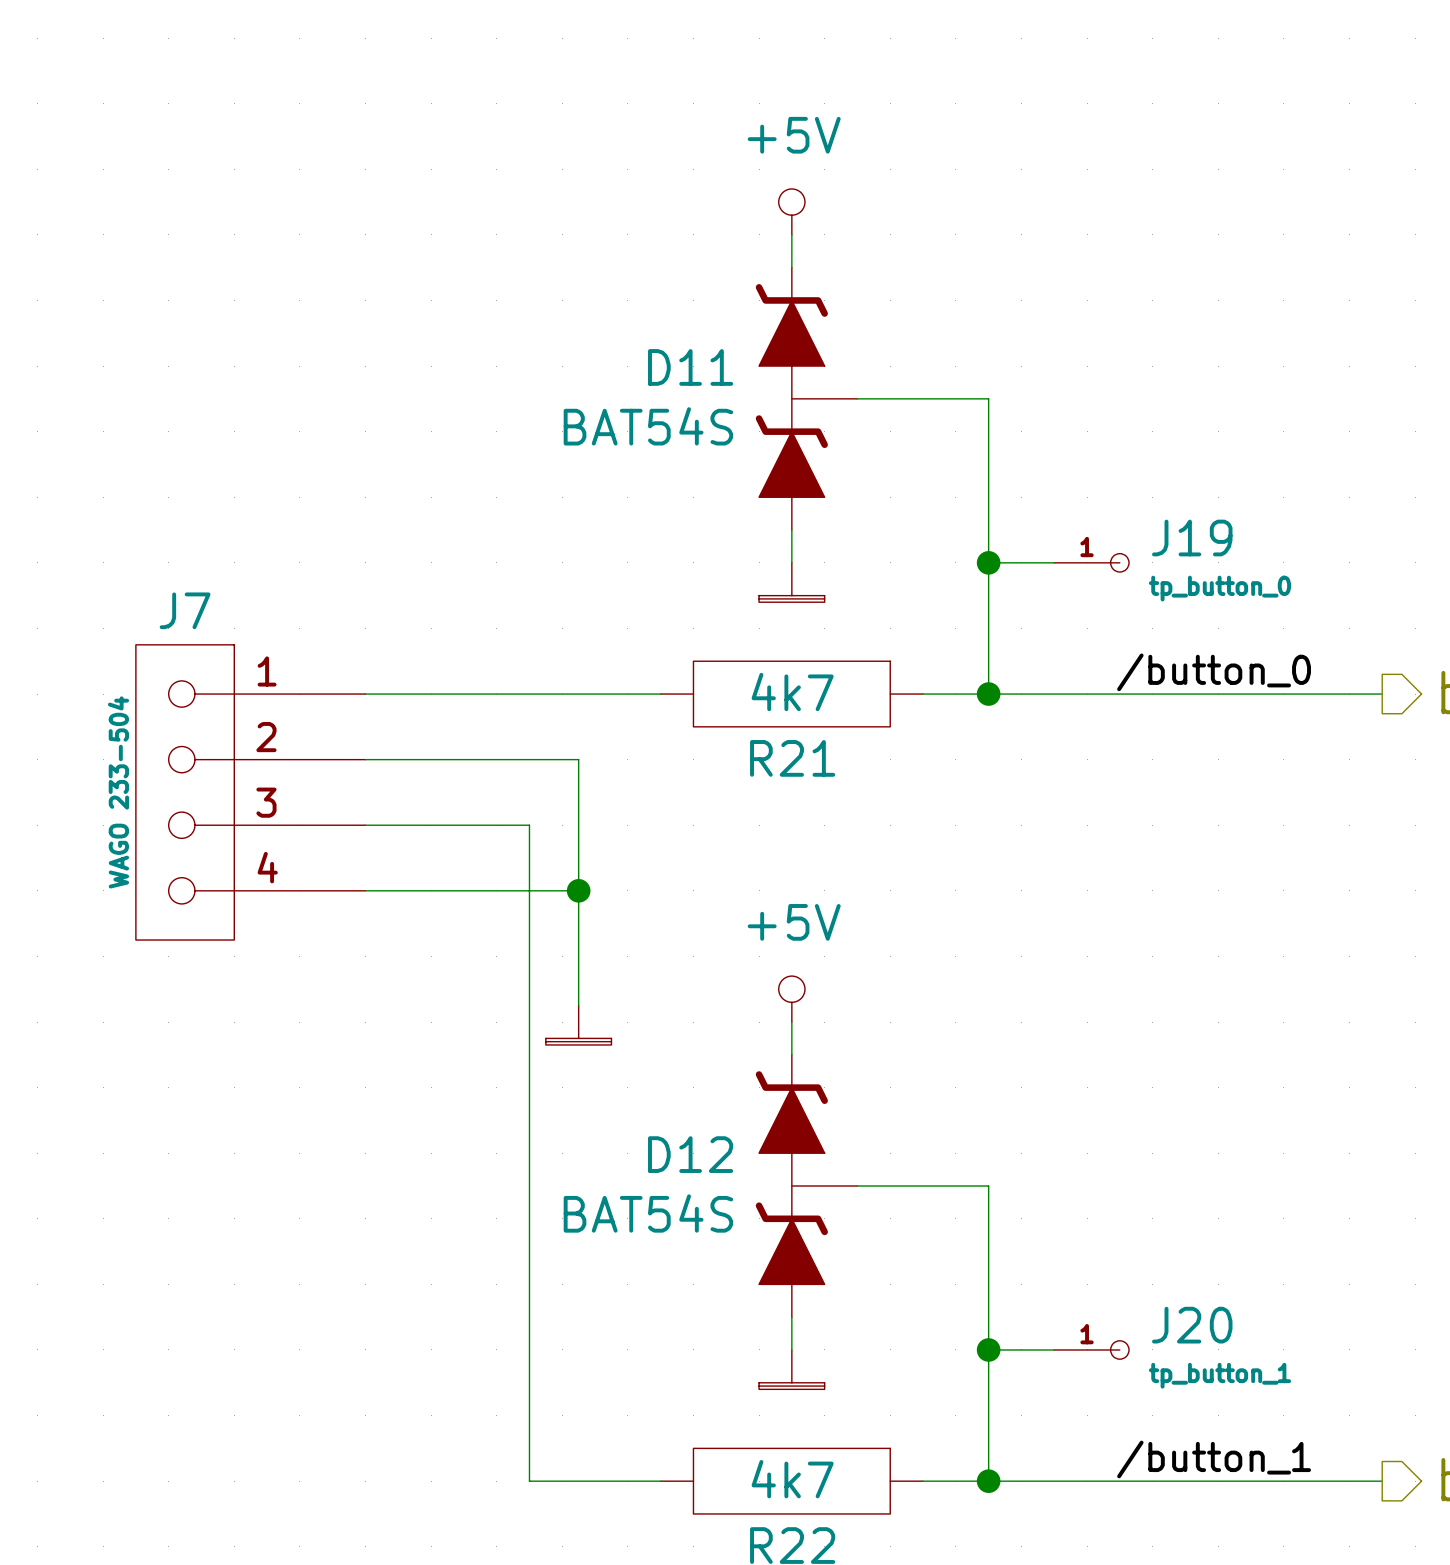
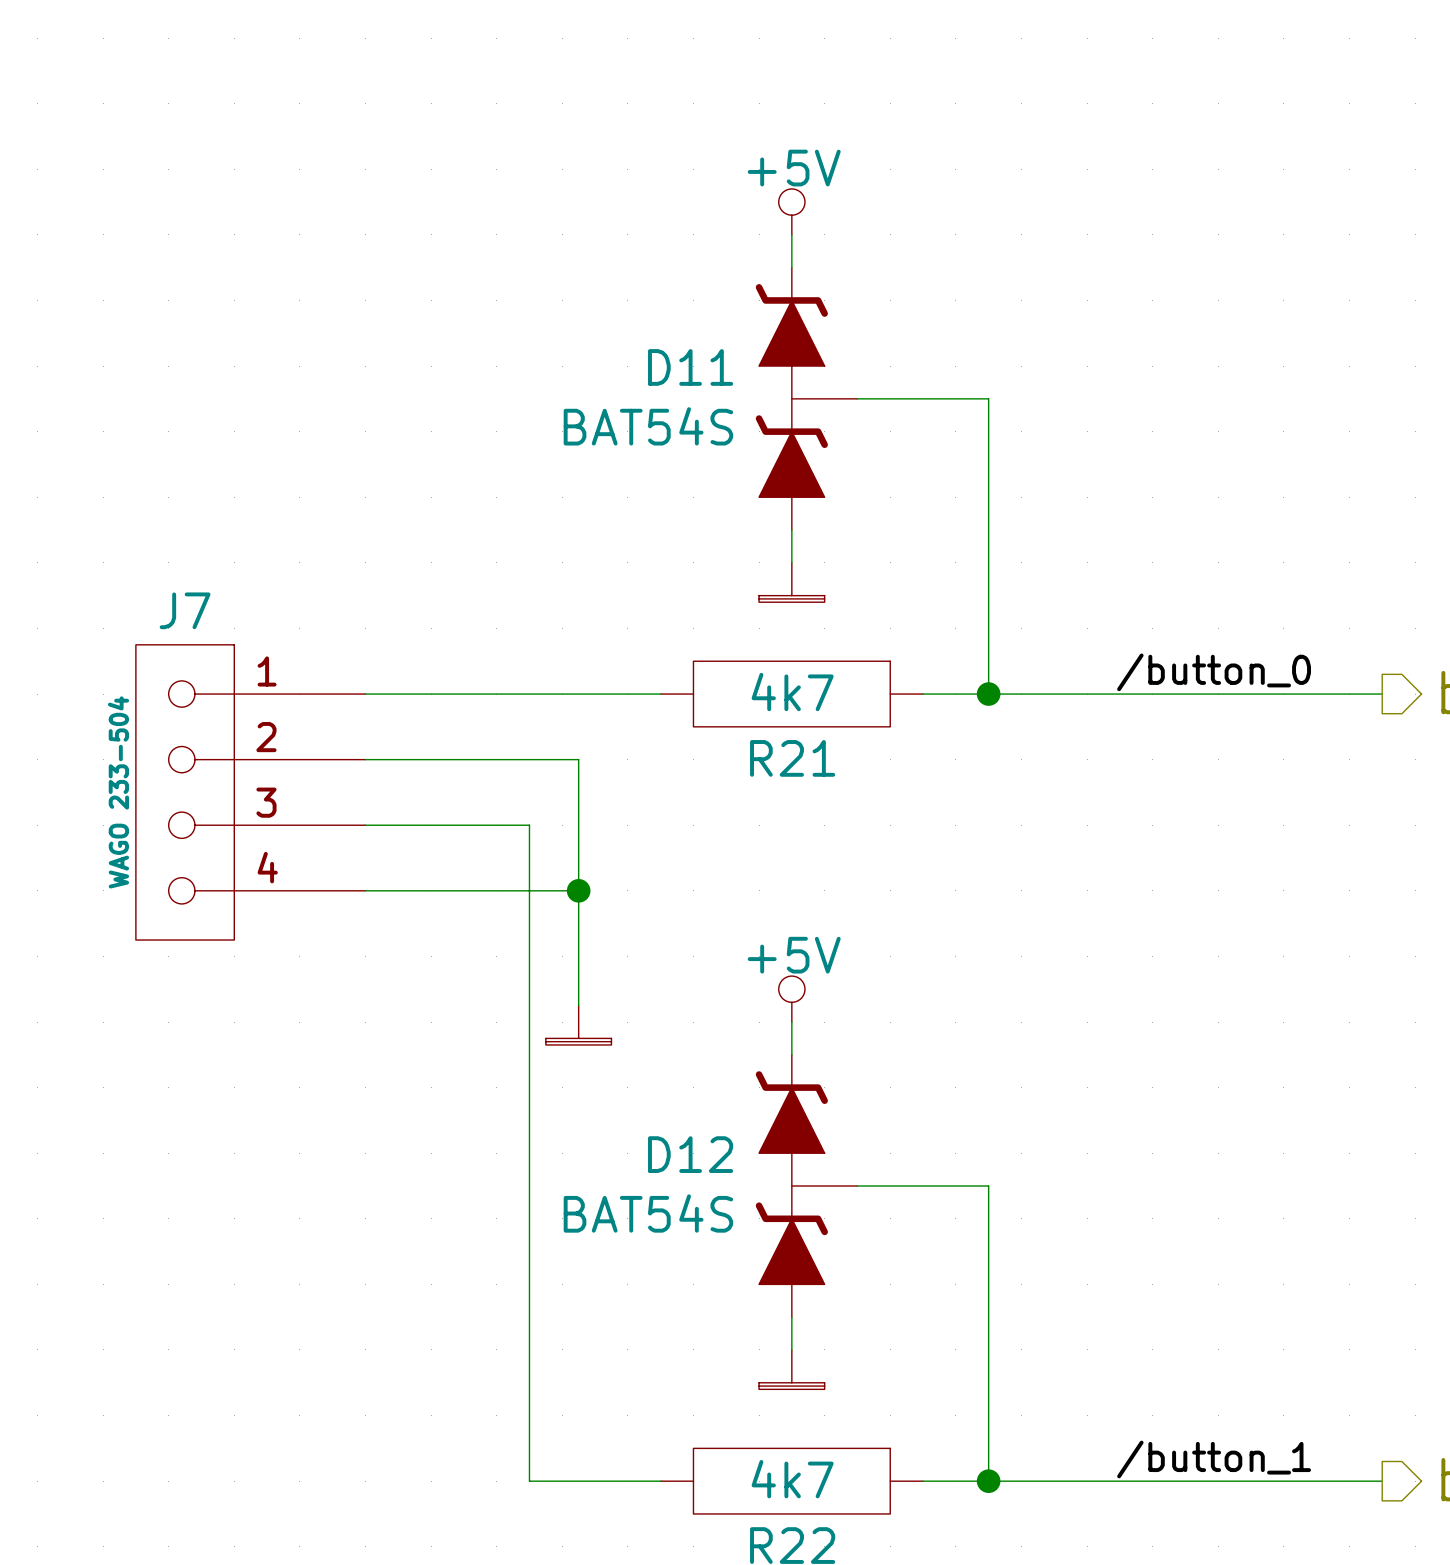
power symbol text position: +5V (794, 135) -> +5V (794, 168)
wire: (988, 562) (1054, 562) -> none
junction: (988, 562) -> none
J19: tp_button_0 (1091, 562) -> none
power symbol text position: +5V (794, 922) -> +5V (794, 955)
wire: (988, 1349) (1054, 1349) -> none
junction: (988, 1349) -> none
J20: tp_button_1 (1091, 1349) -> none

